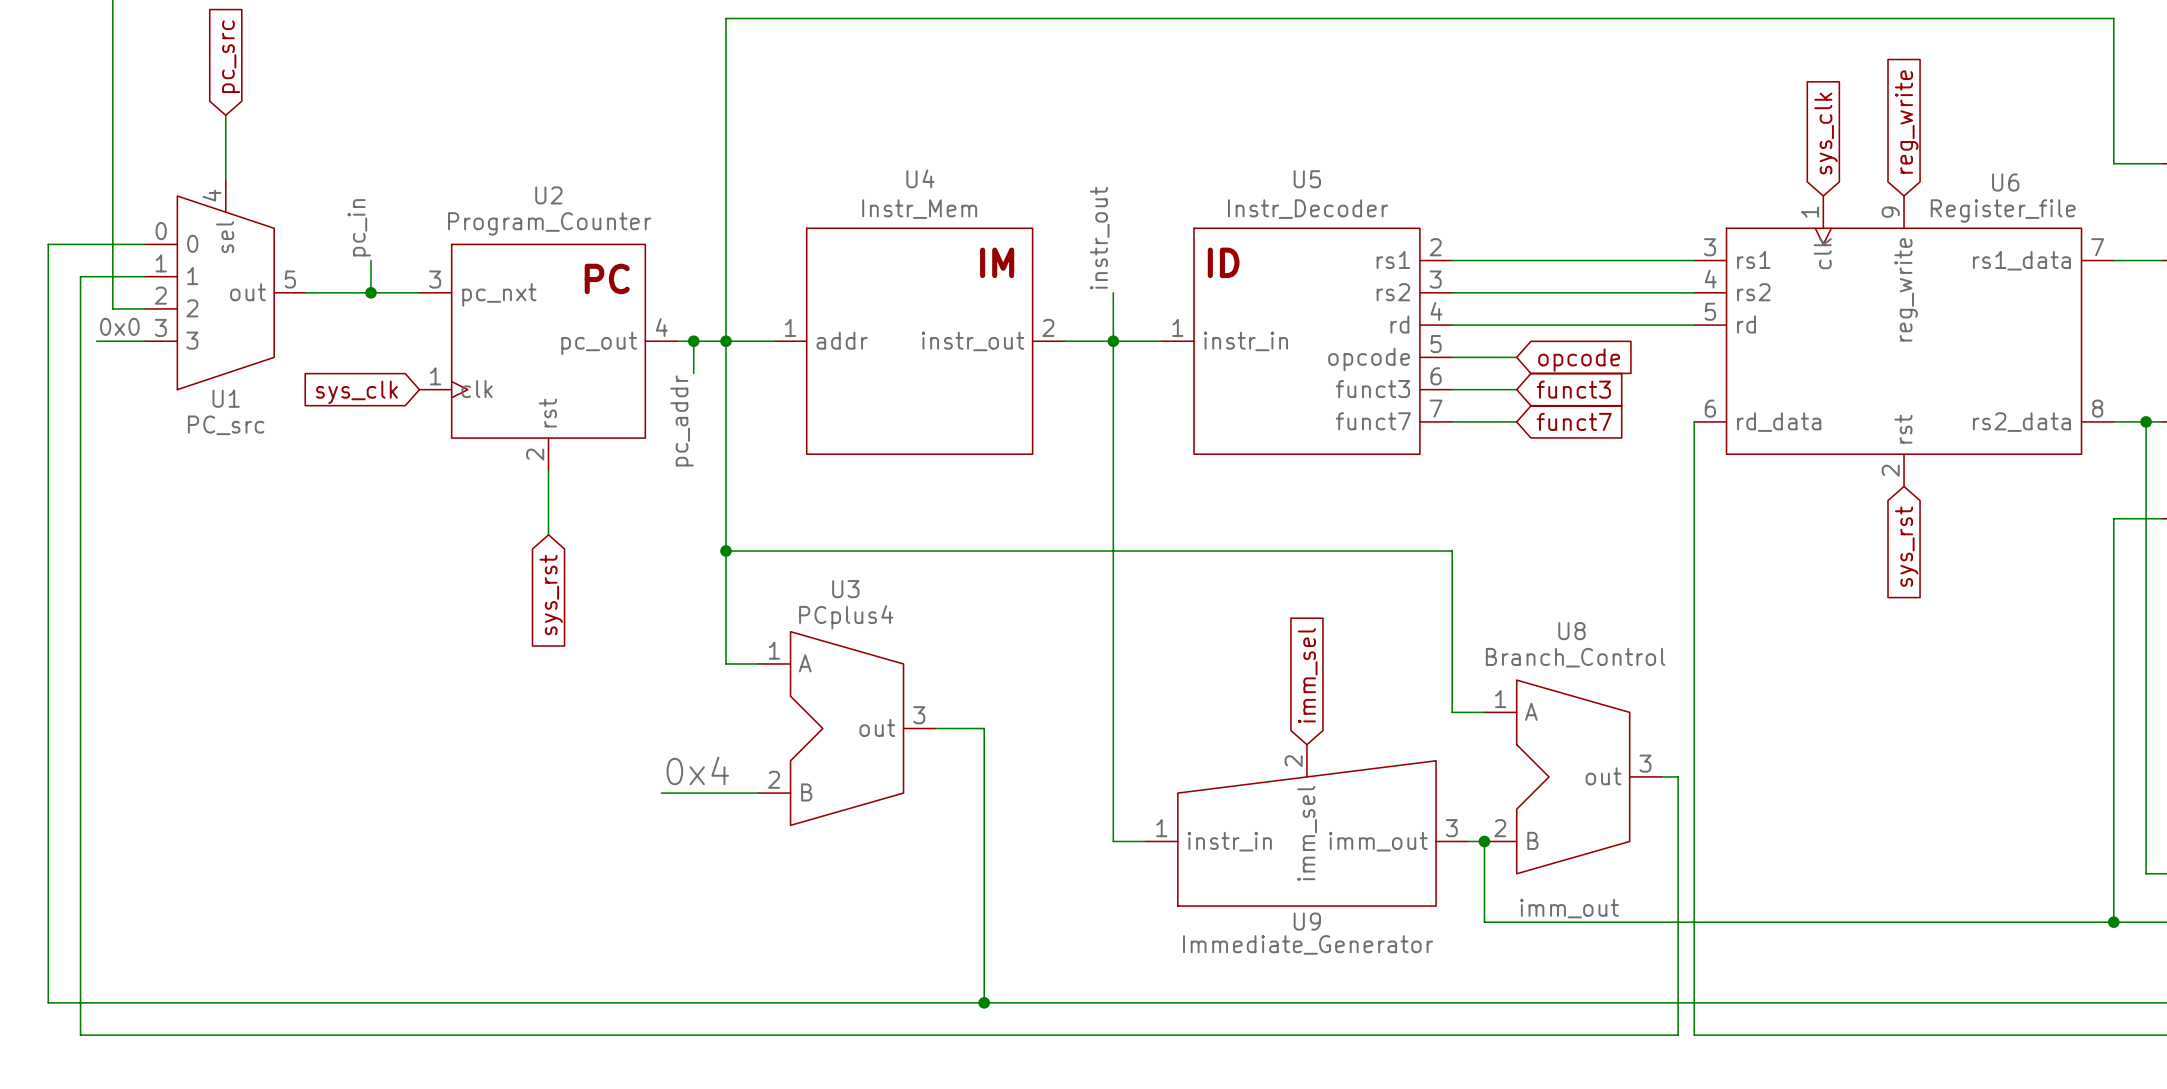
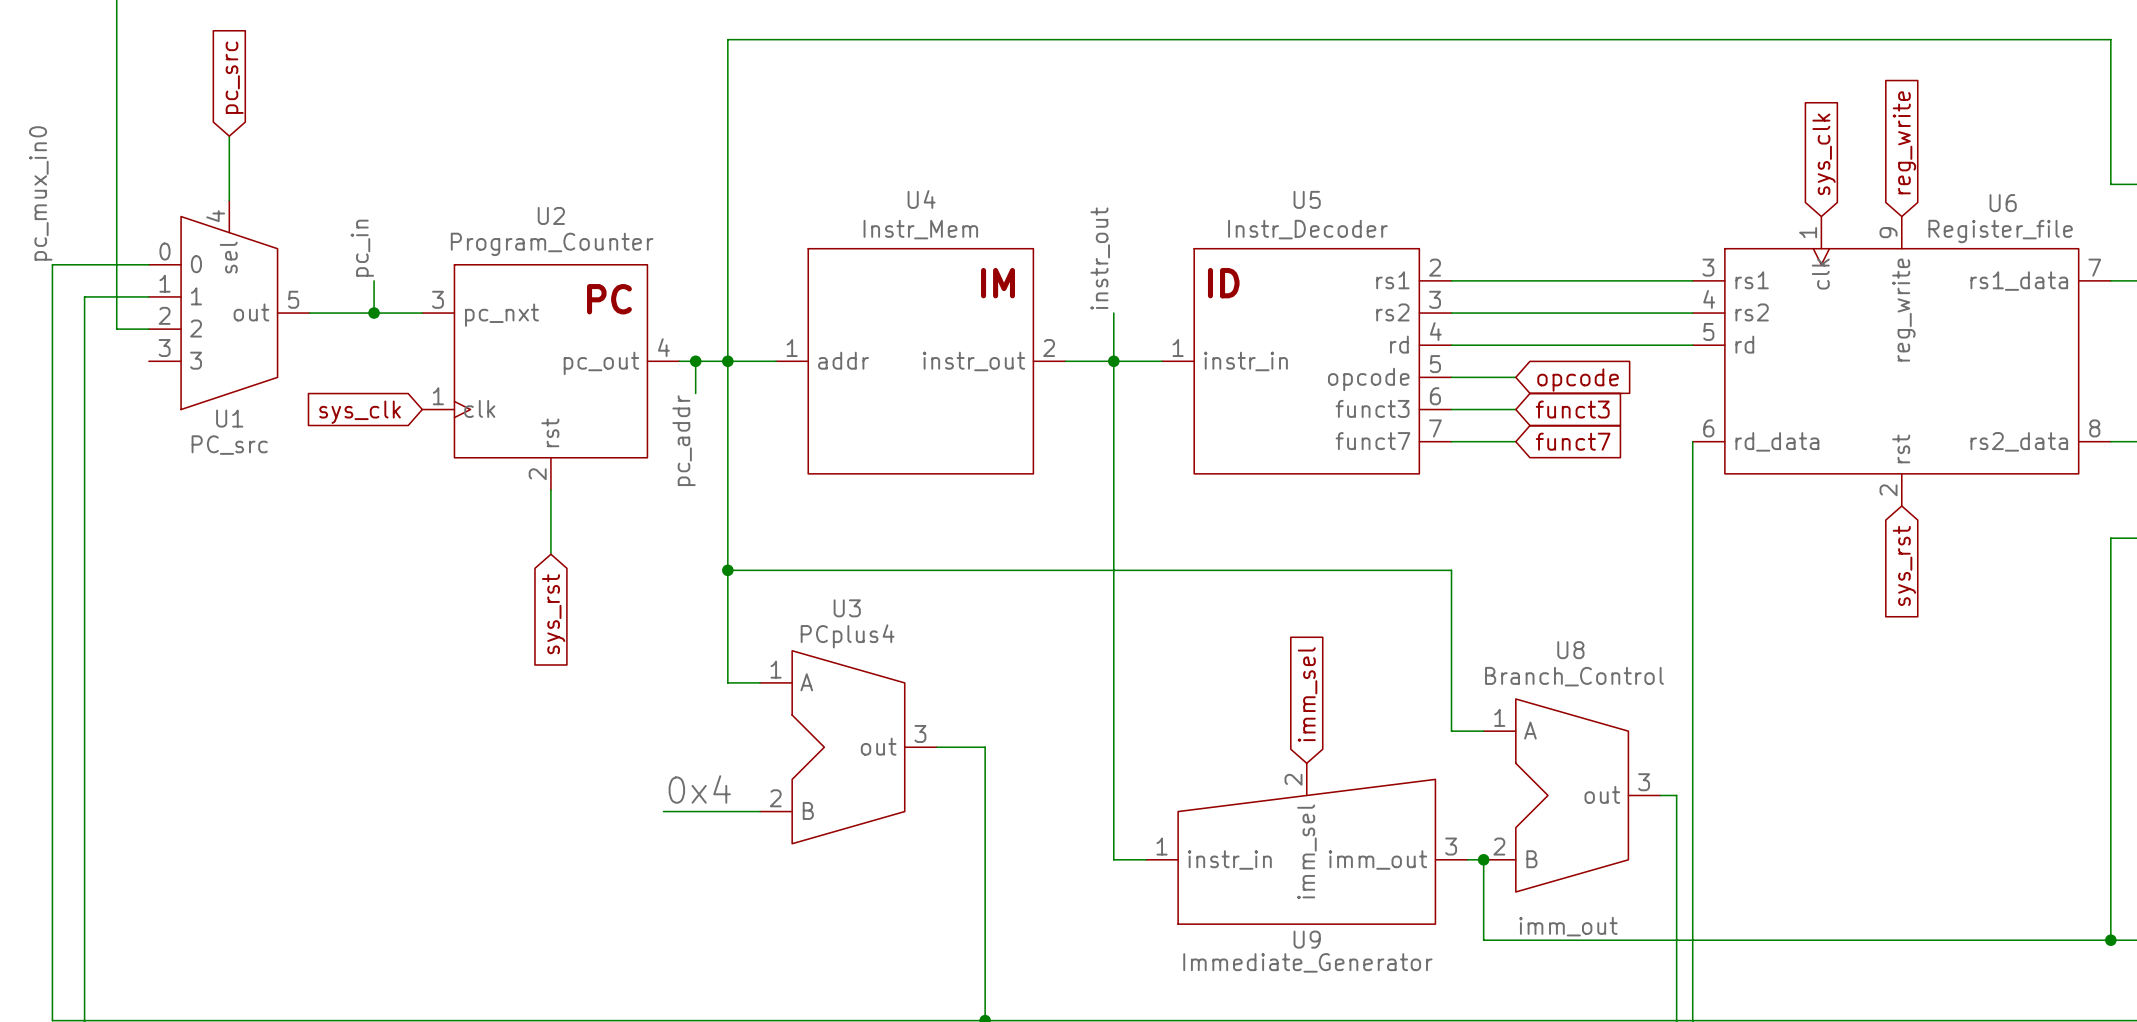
label: none -> pc_mux_in0 (40, 193)
label: 0x0 (119, 326) -> none
wire: (96, 341) (145, 341) -> none

